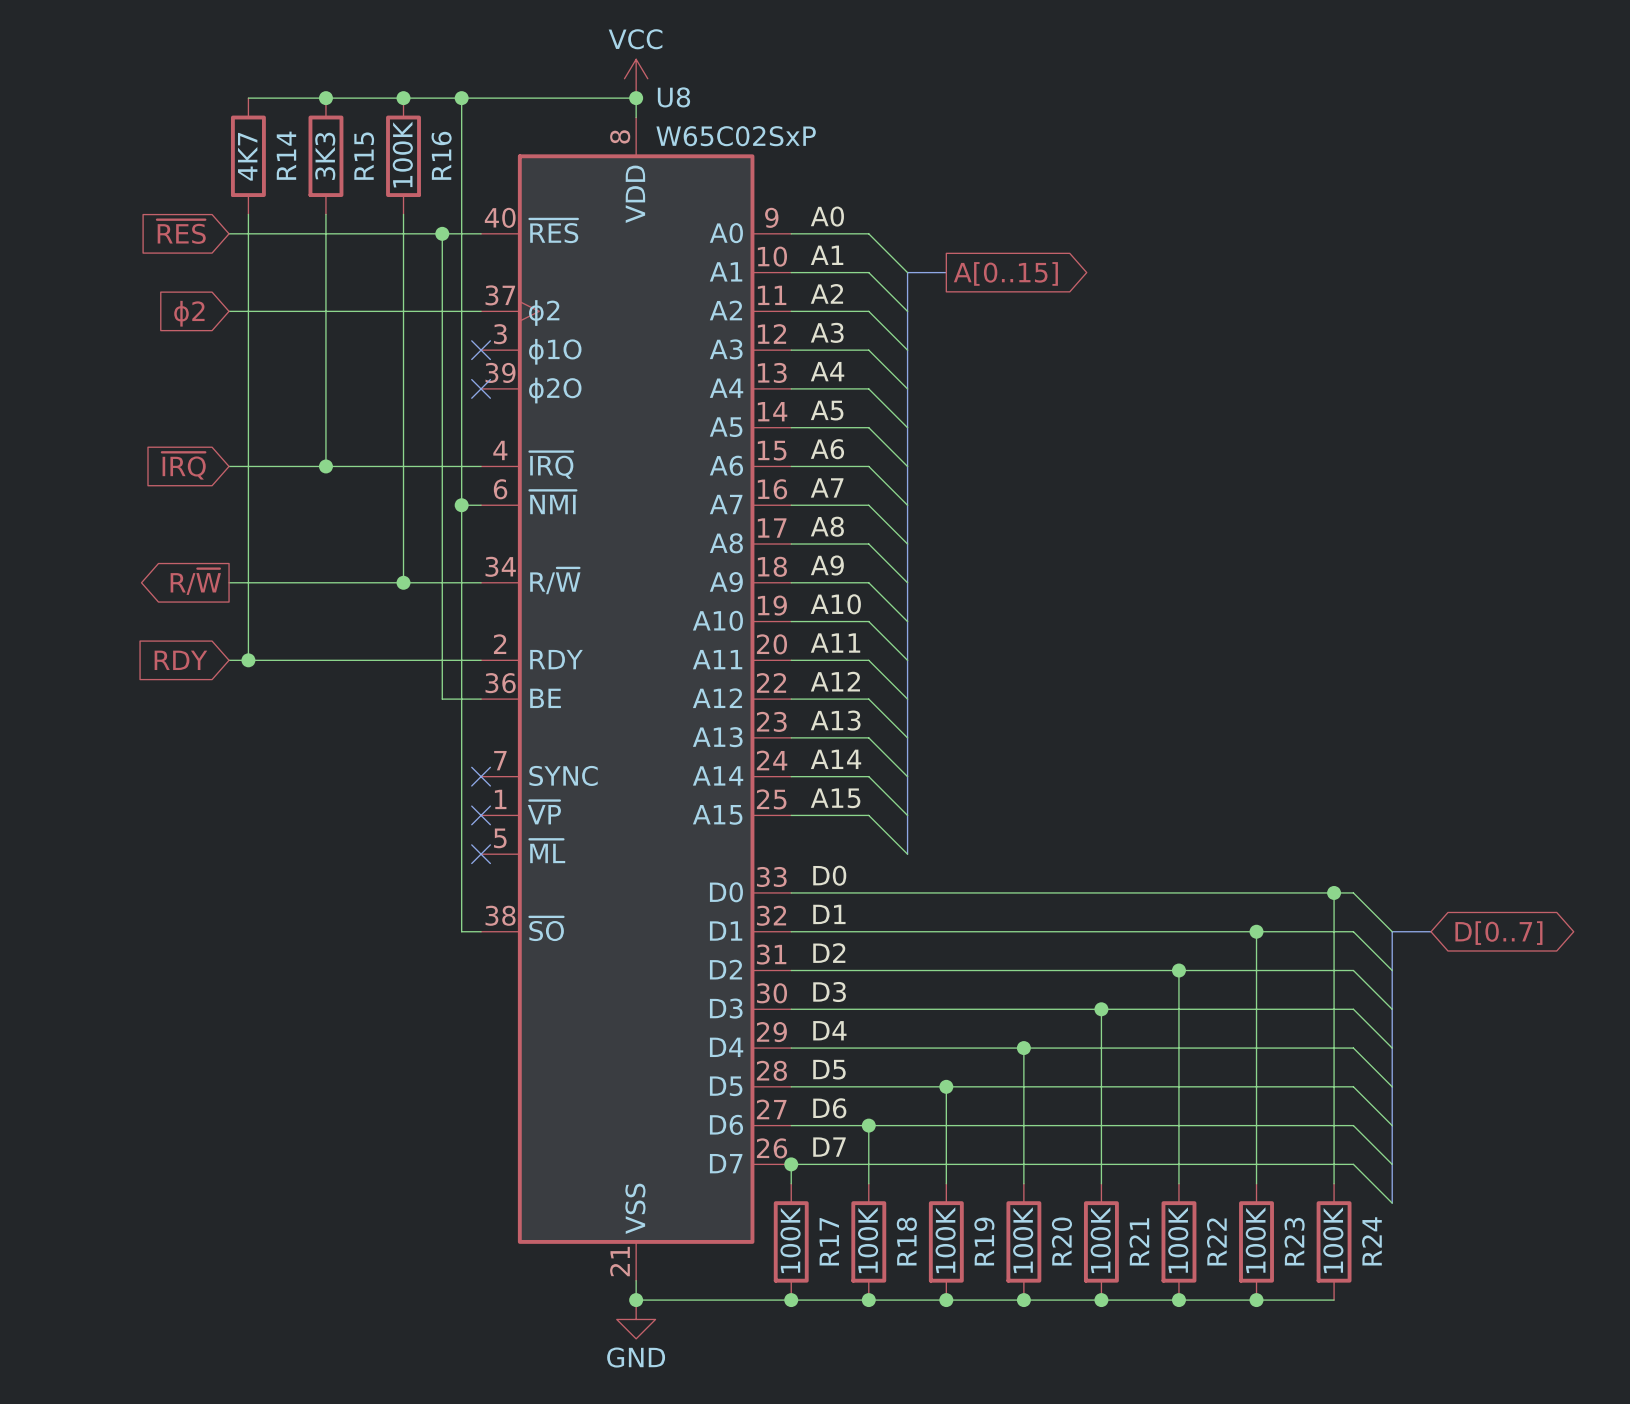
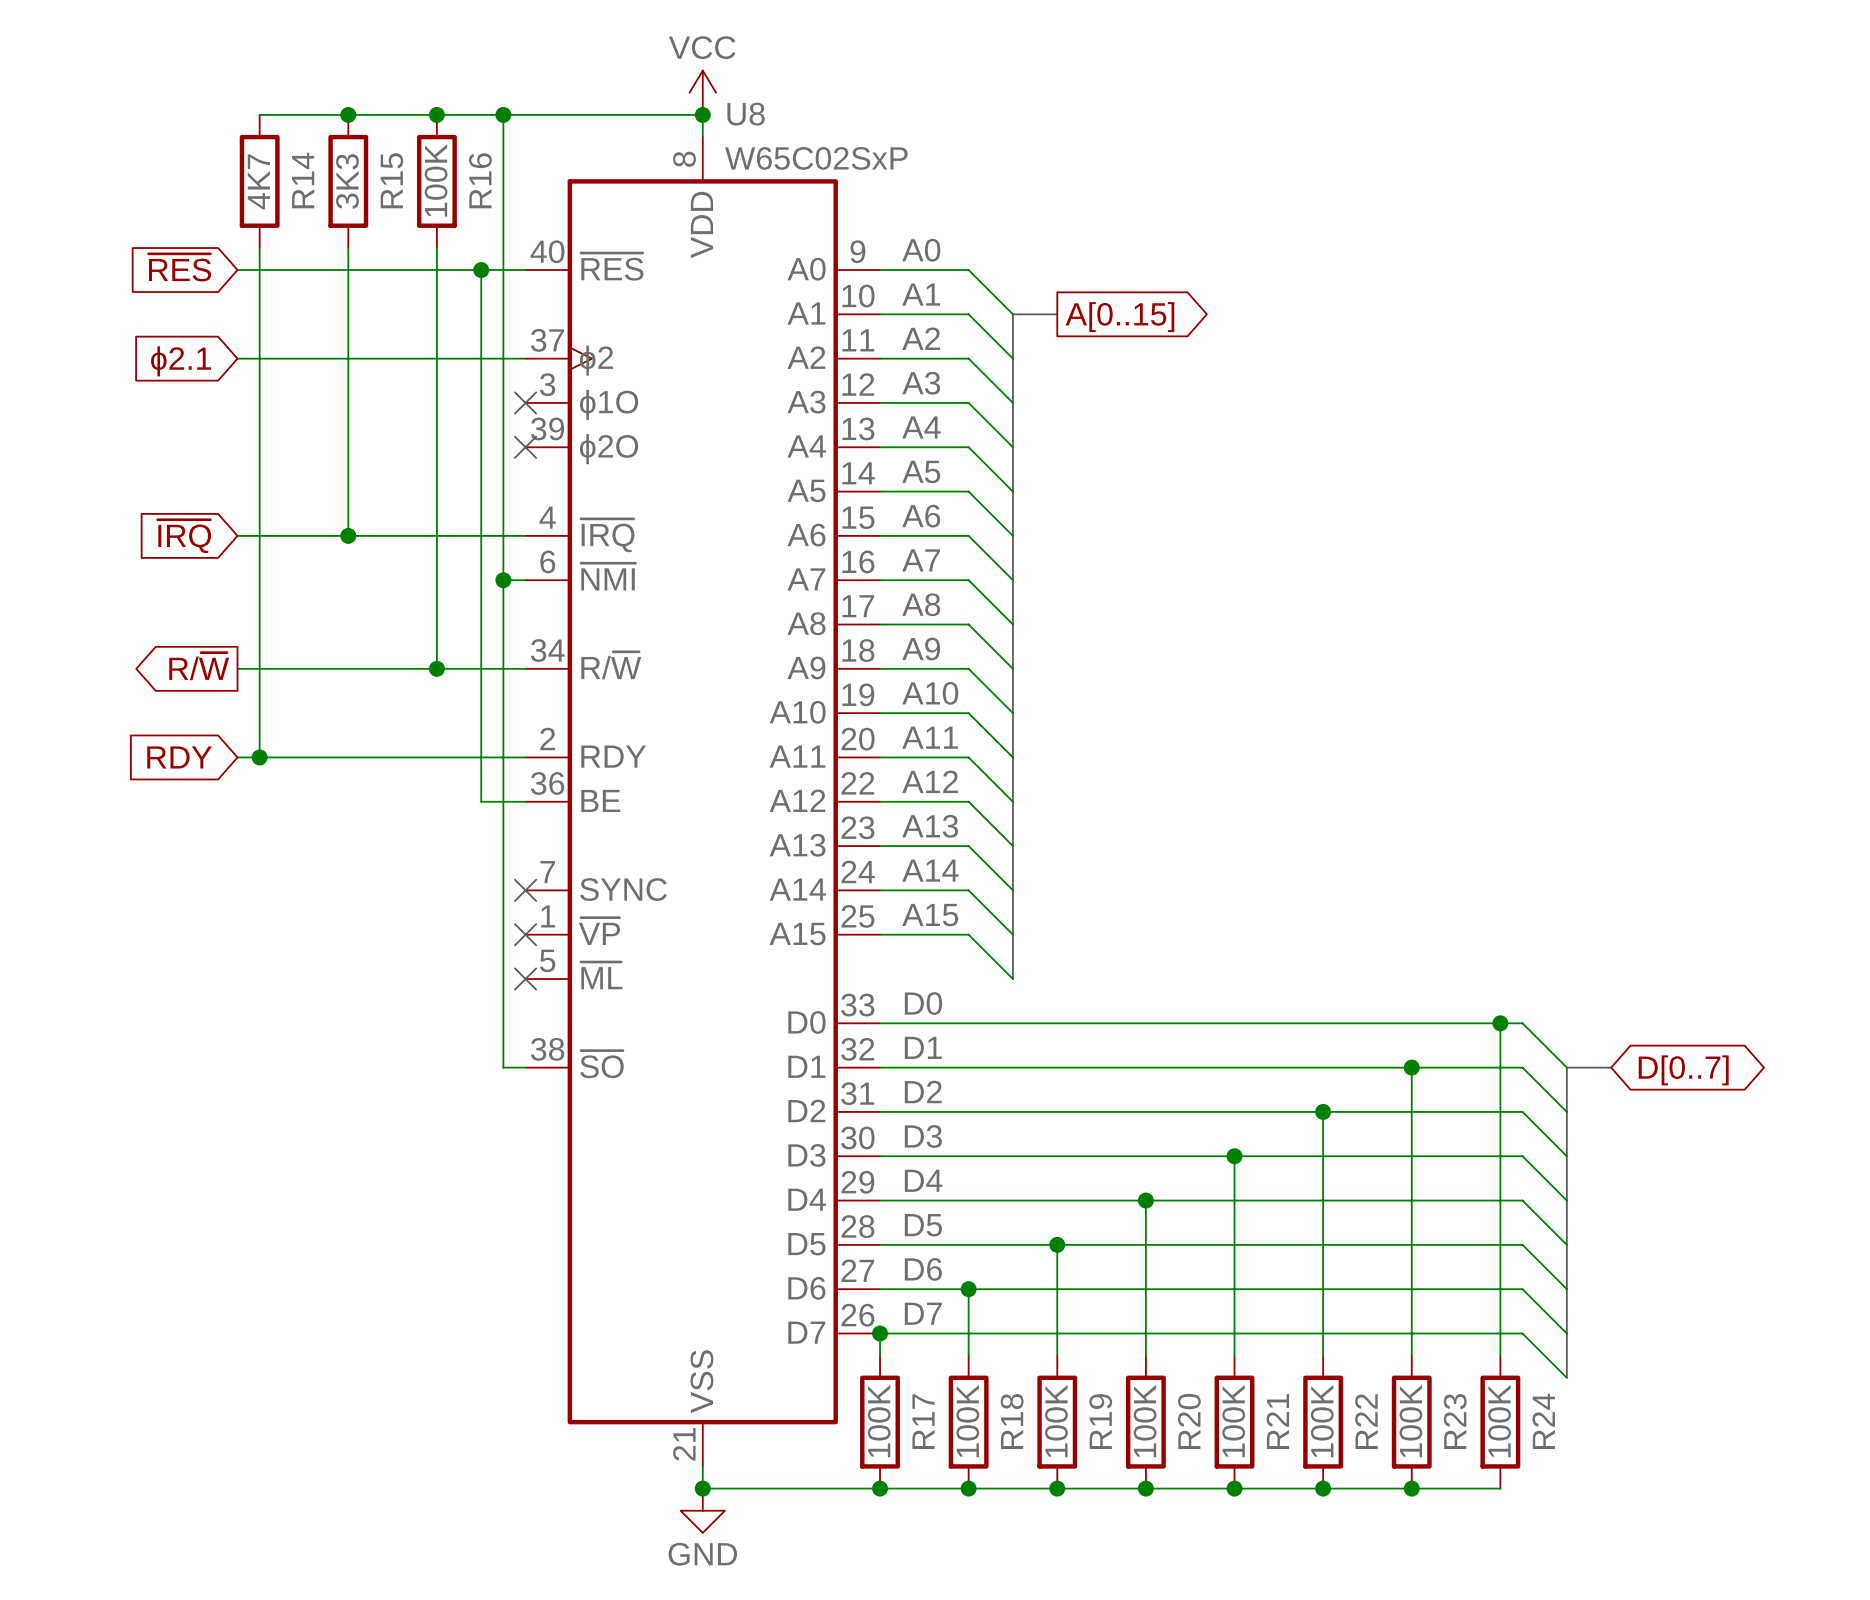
global label: ϕ2 (189, 313) -> ϕ2.1 (181, 361)

